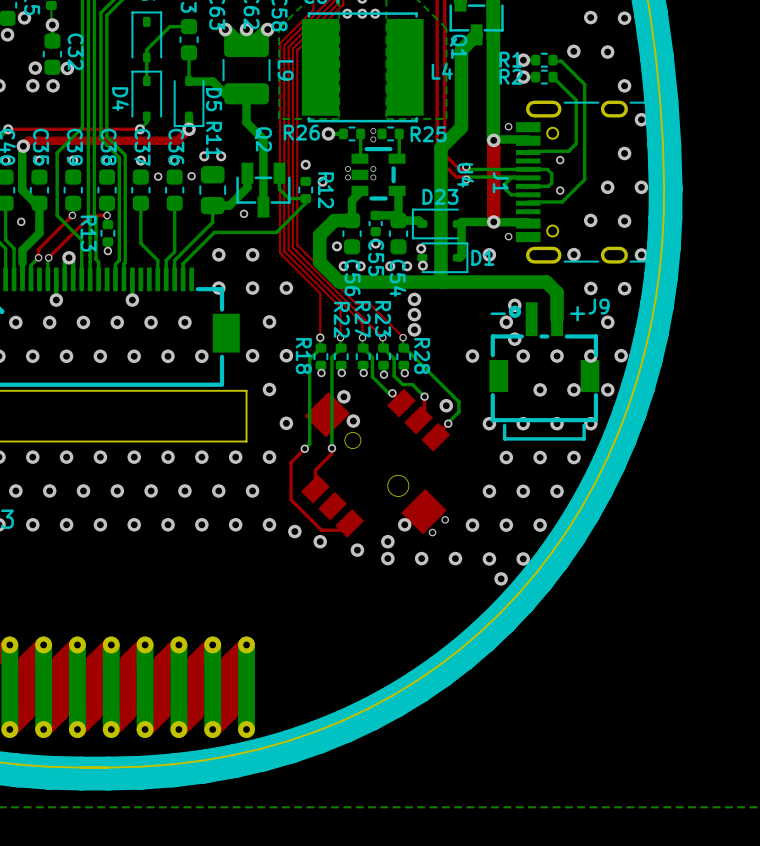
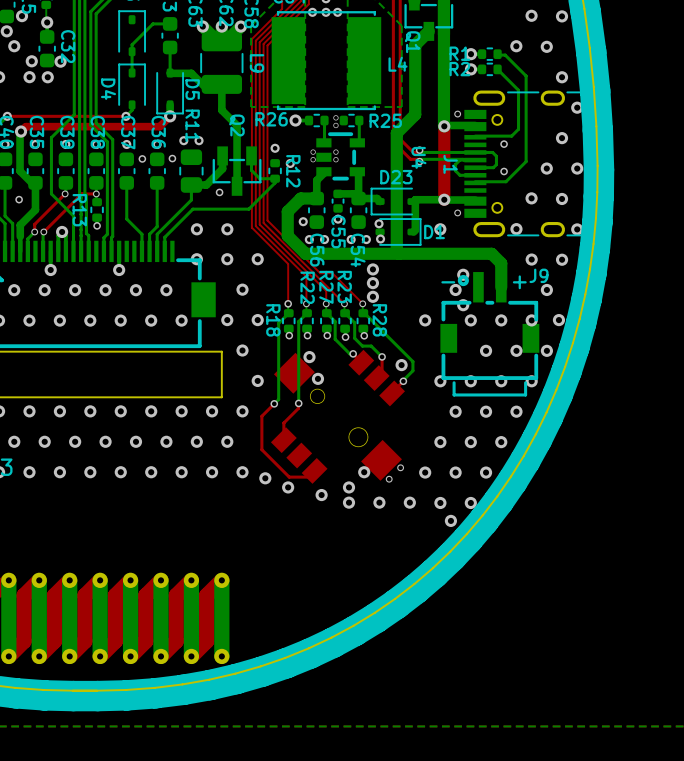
via: none -> (14, 46)

